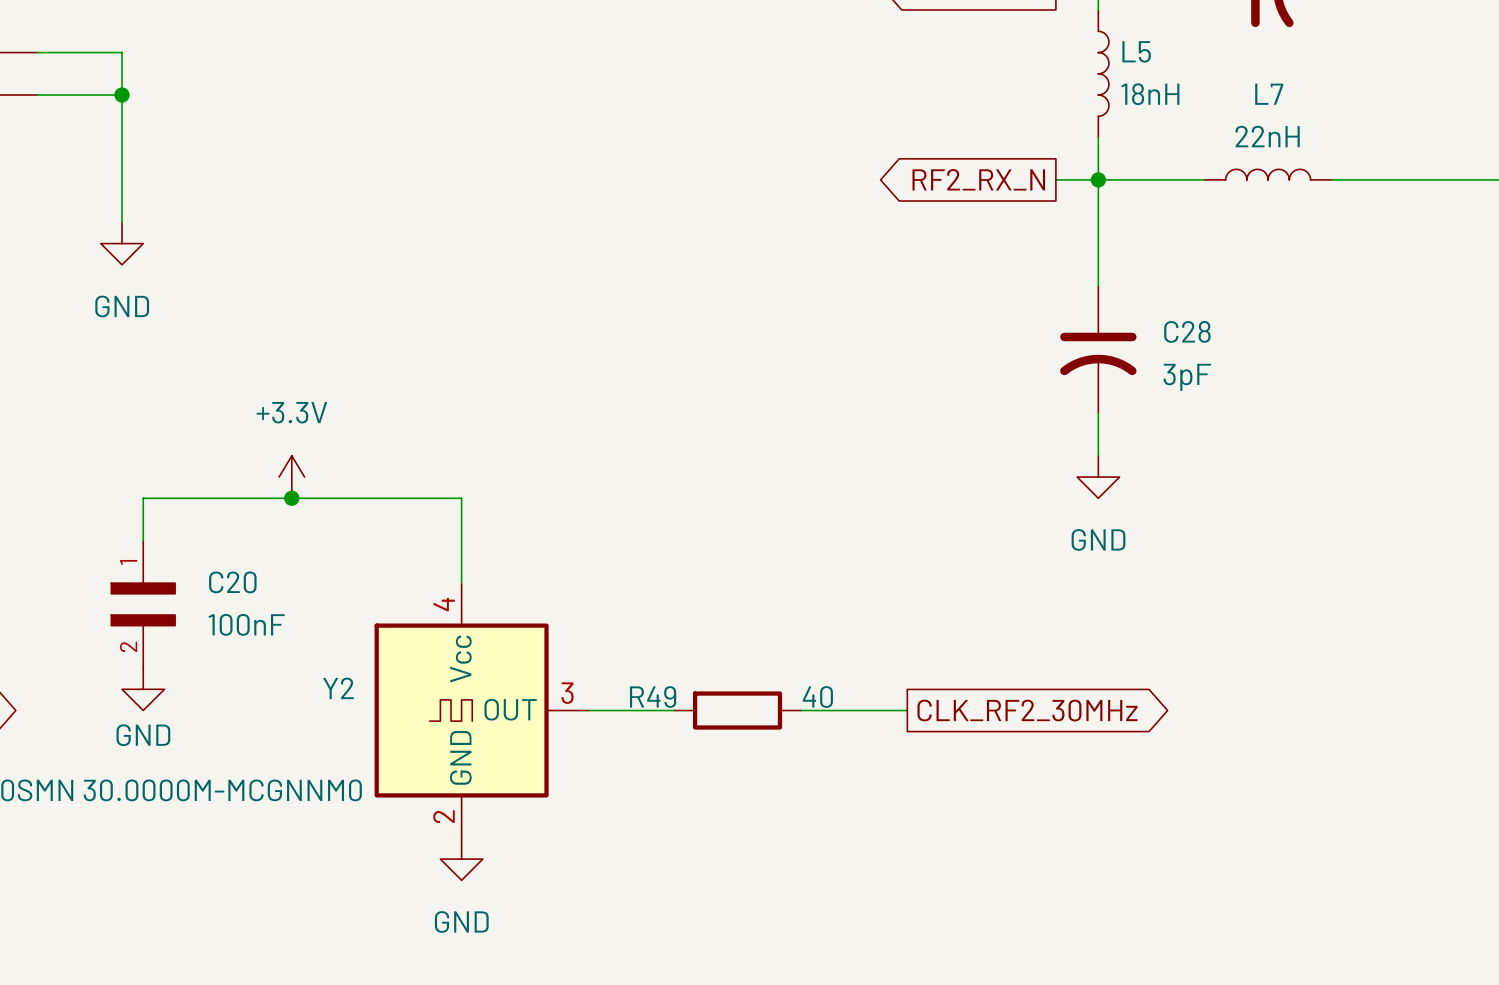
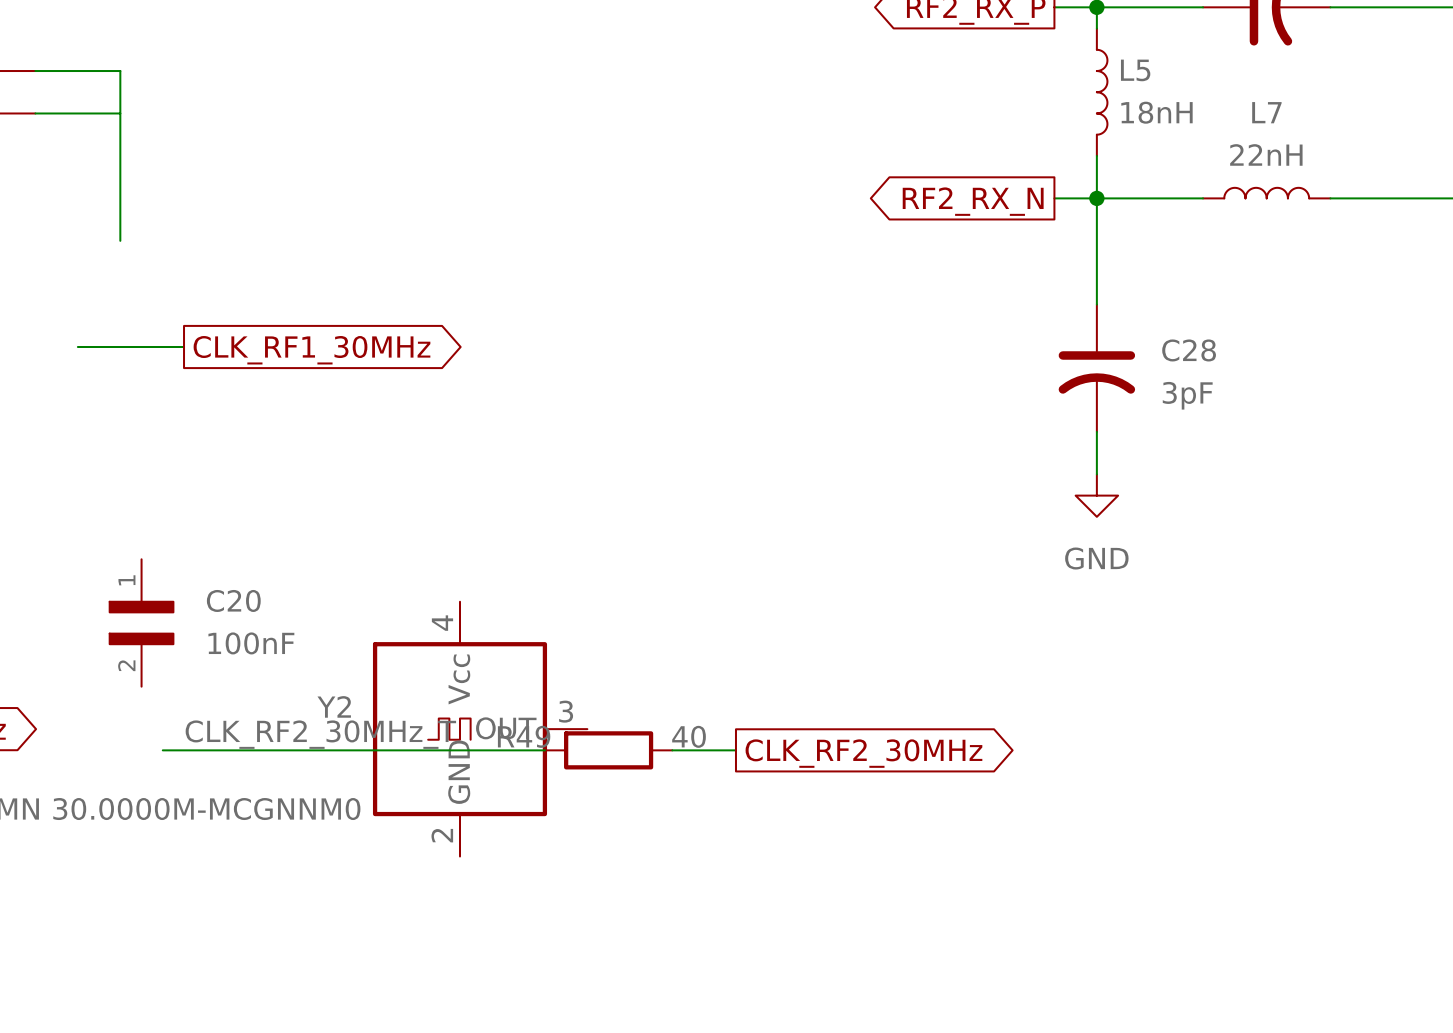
junction: (122, 95) -> none
power symbol: GND (122, 243) -> none
wire: none -> (77, 347) (184, 347)
global label: none -> CLK_RF1_30MHz (311, 350)
power symbol: +3.3V (291, 477) -> none
junction: (291, 498) -> none
wire: (143, 540) (143, 498) (461, 498) (461, 583) -> none
power symbol: GND (143, 689) -> none
wire: (588, 710) (673, 710) -> none
R49 position: (737, 710) -> (608, 750)
global label position: CLK_RF2_30MHz (1027, 710) -> CLK_RF2_30MHz (863, 753)
label: none -> CLK_RF2_30MHz_T (320, 734)
wire: none -> (162, 750) (544, 750)
wire: none -> (672, 750) (735, 750)
power symbol: GND (461, 859) -> none

